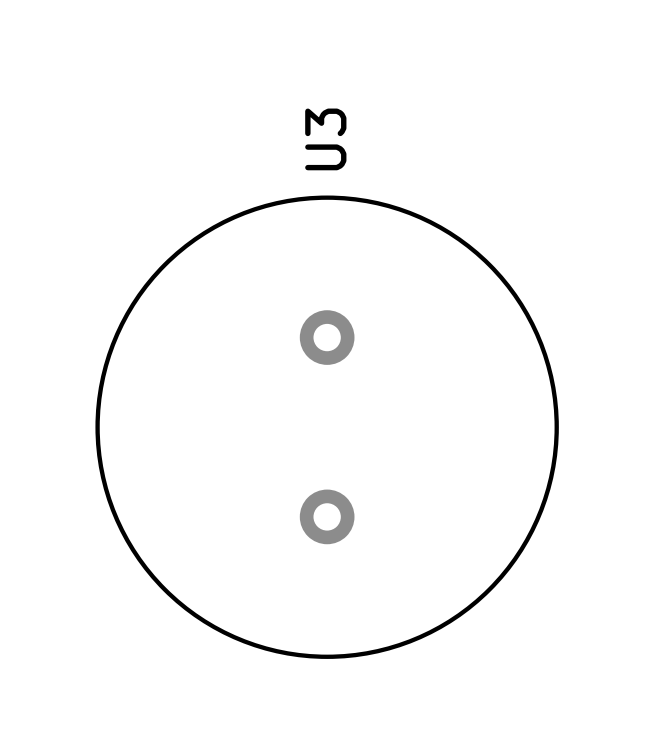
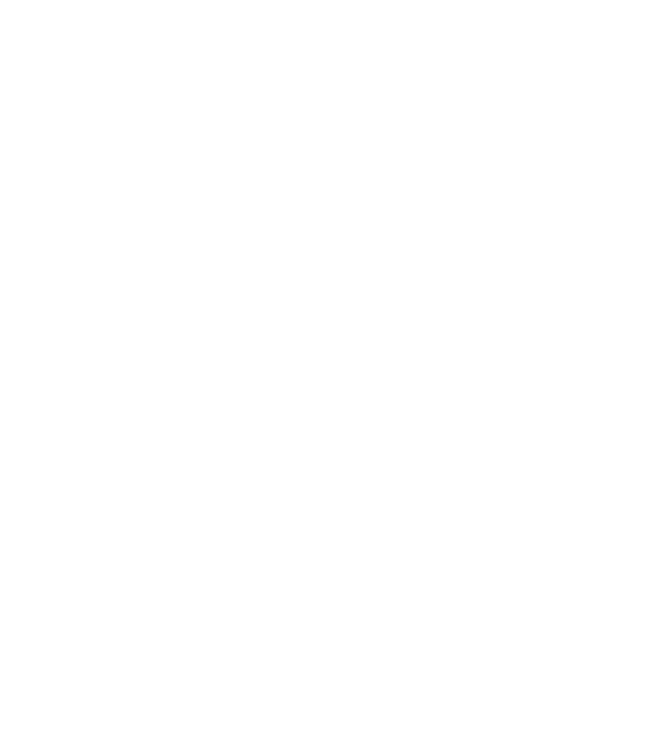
U3: (327, 427) -> none

